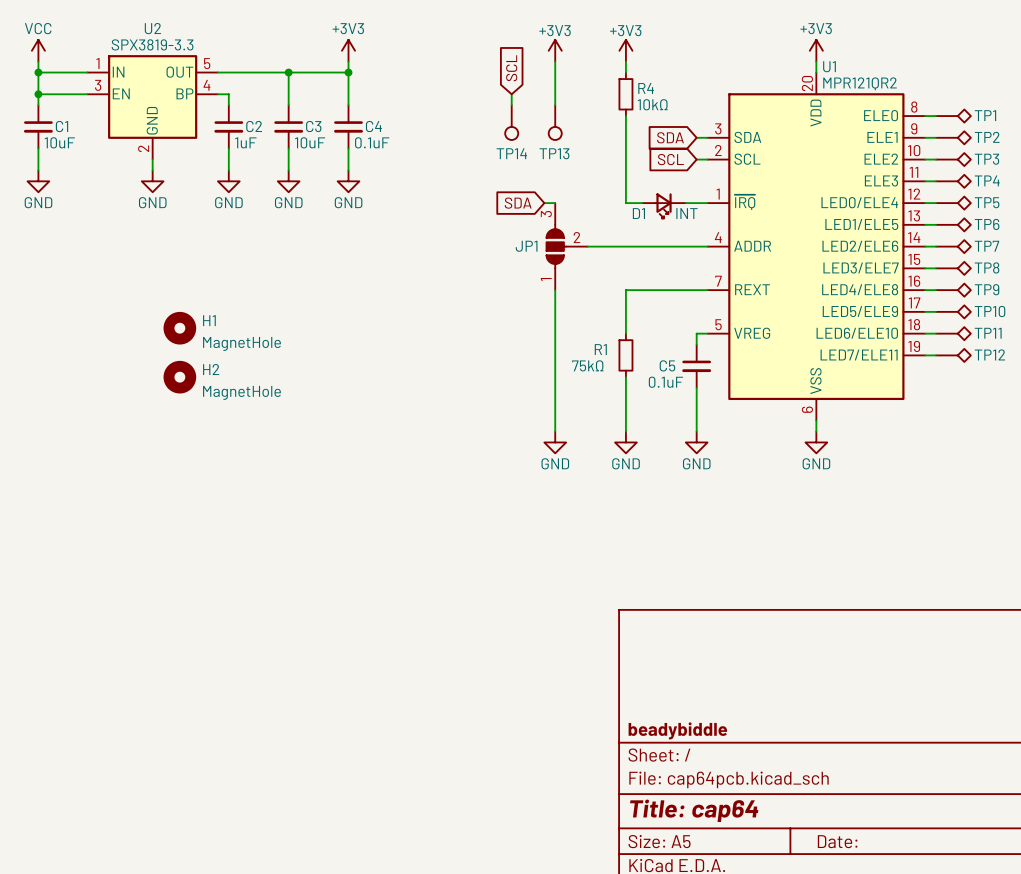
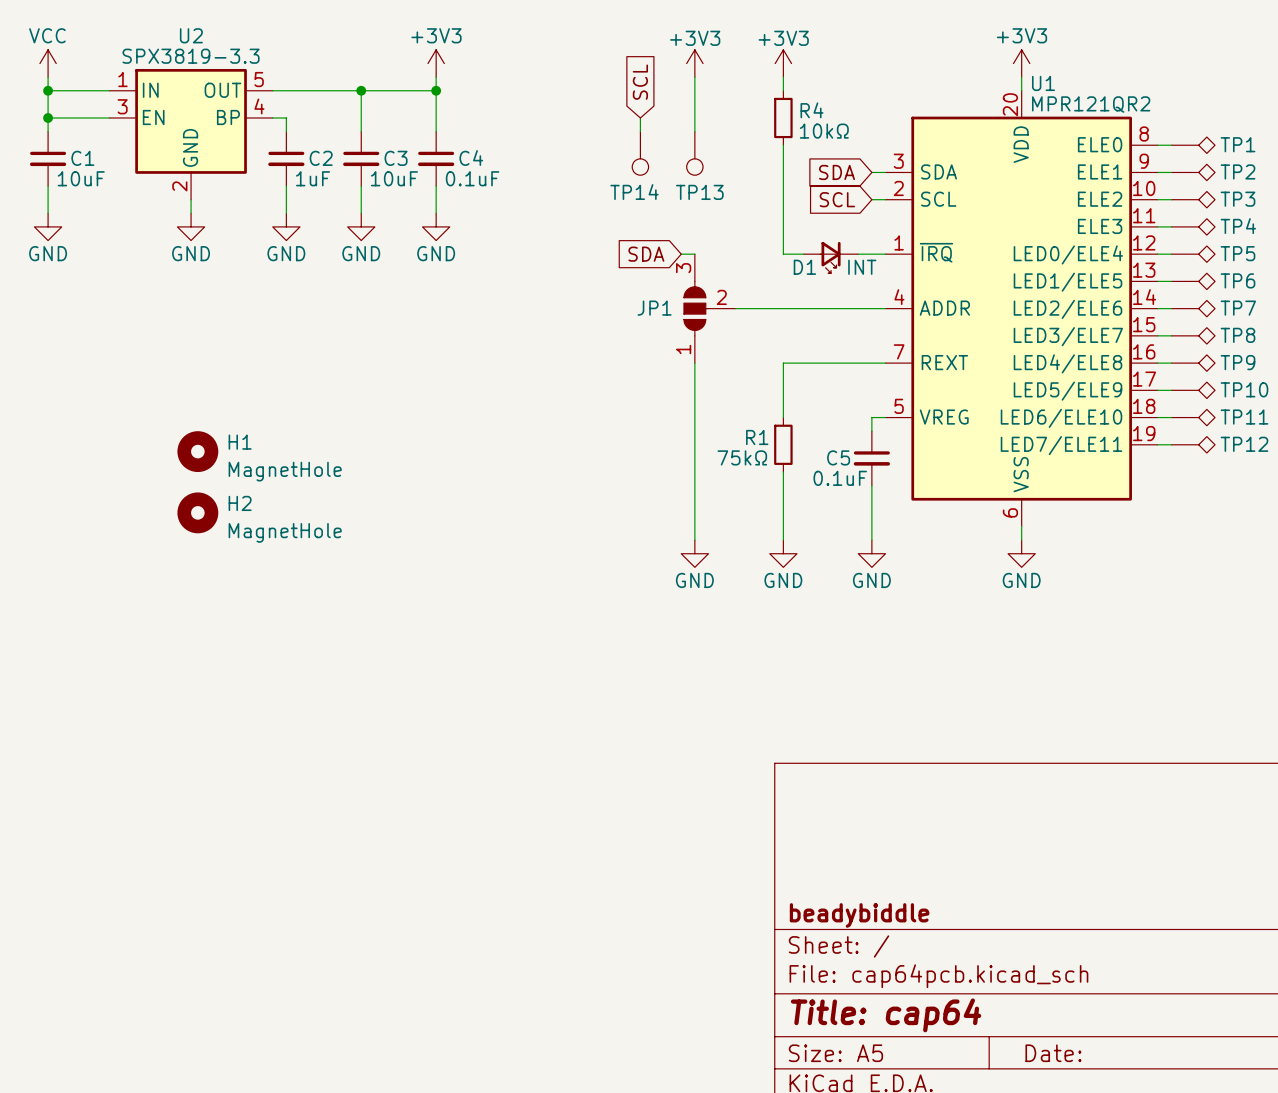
H1 position: (179, 328) -> (197, 451)
H2 position: (179, 377) -> (197, 512)

